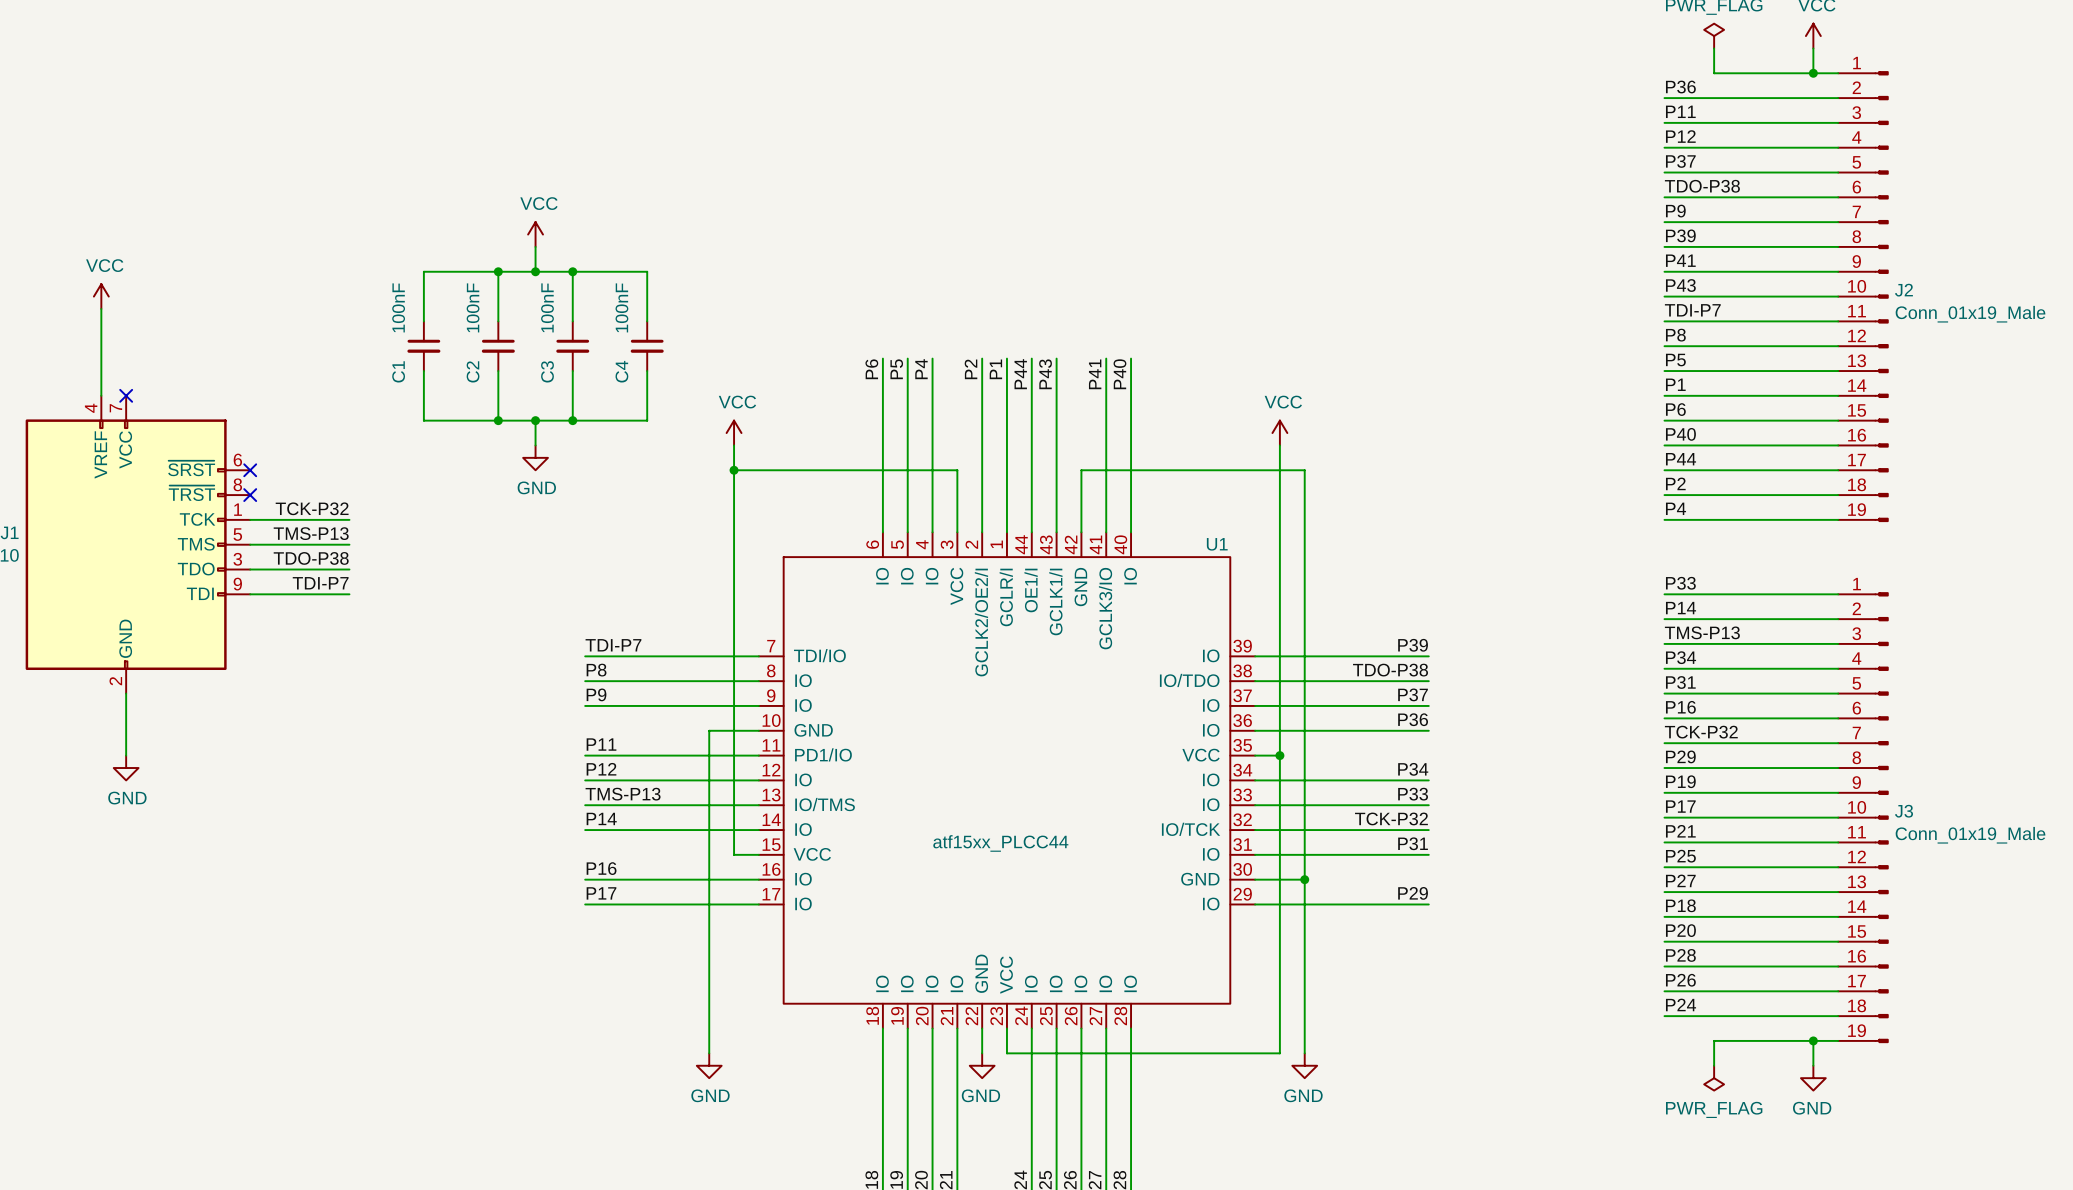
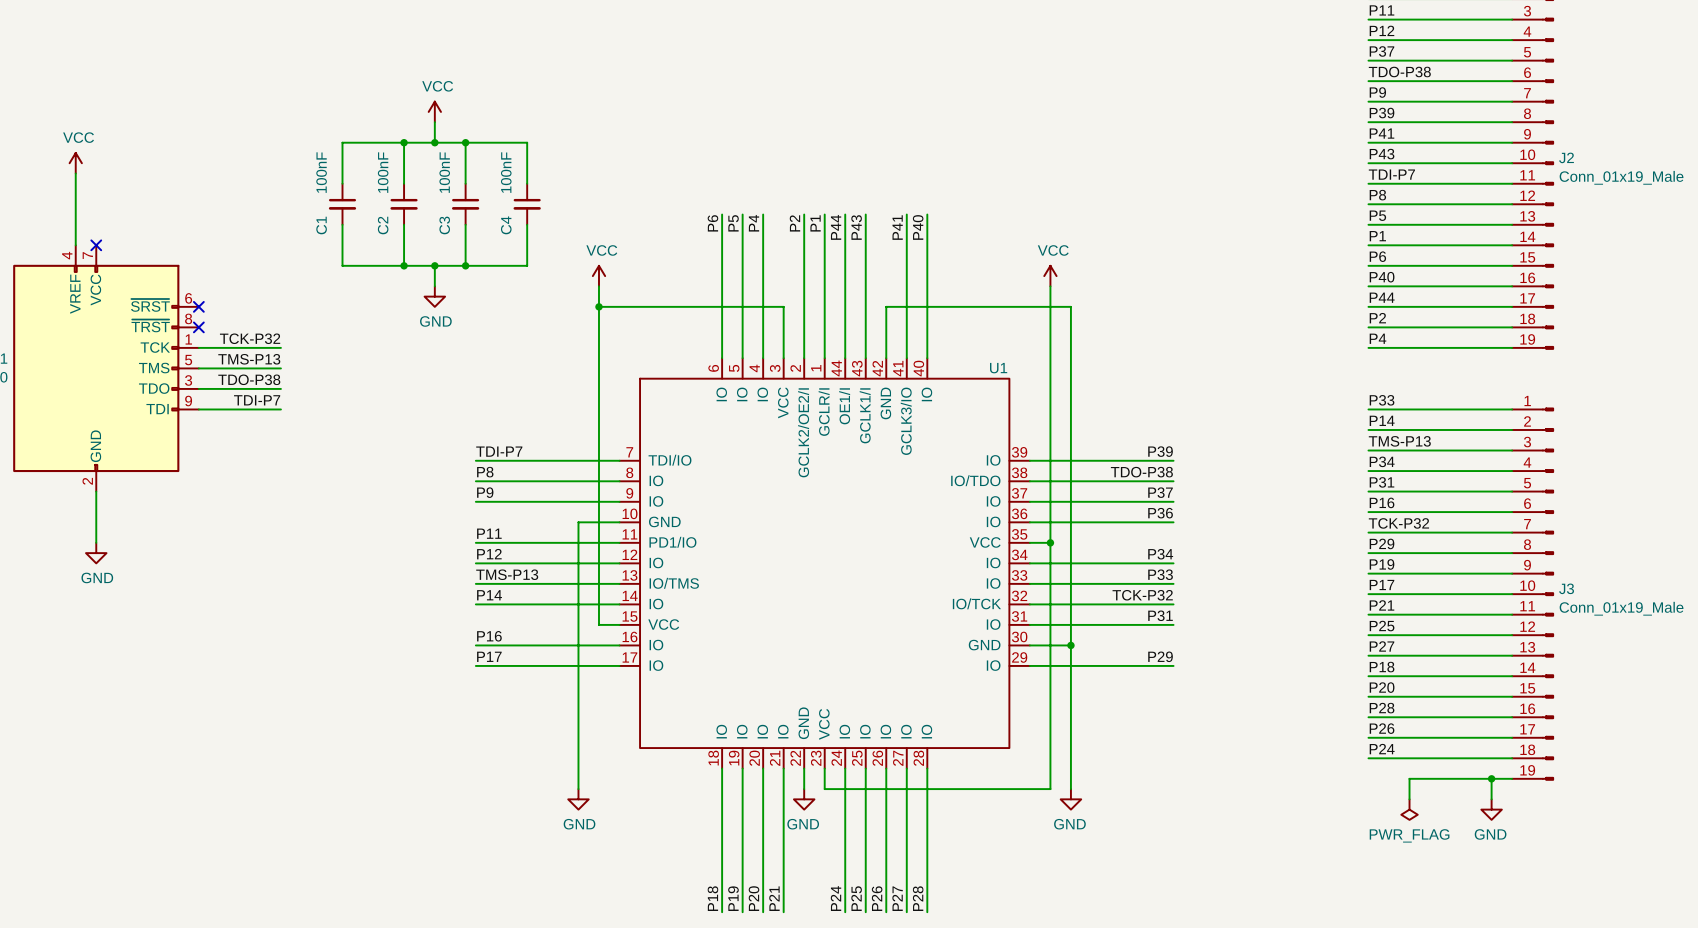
U1 value: atf15xx_PLCC44 (1000, 843) -> none

